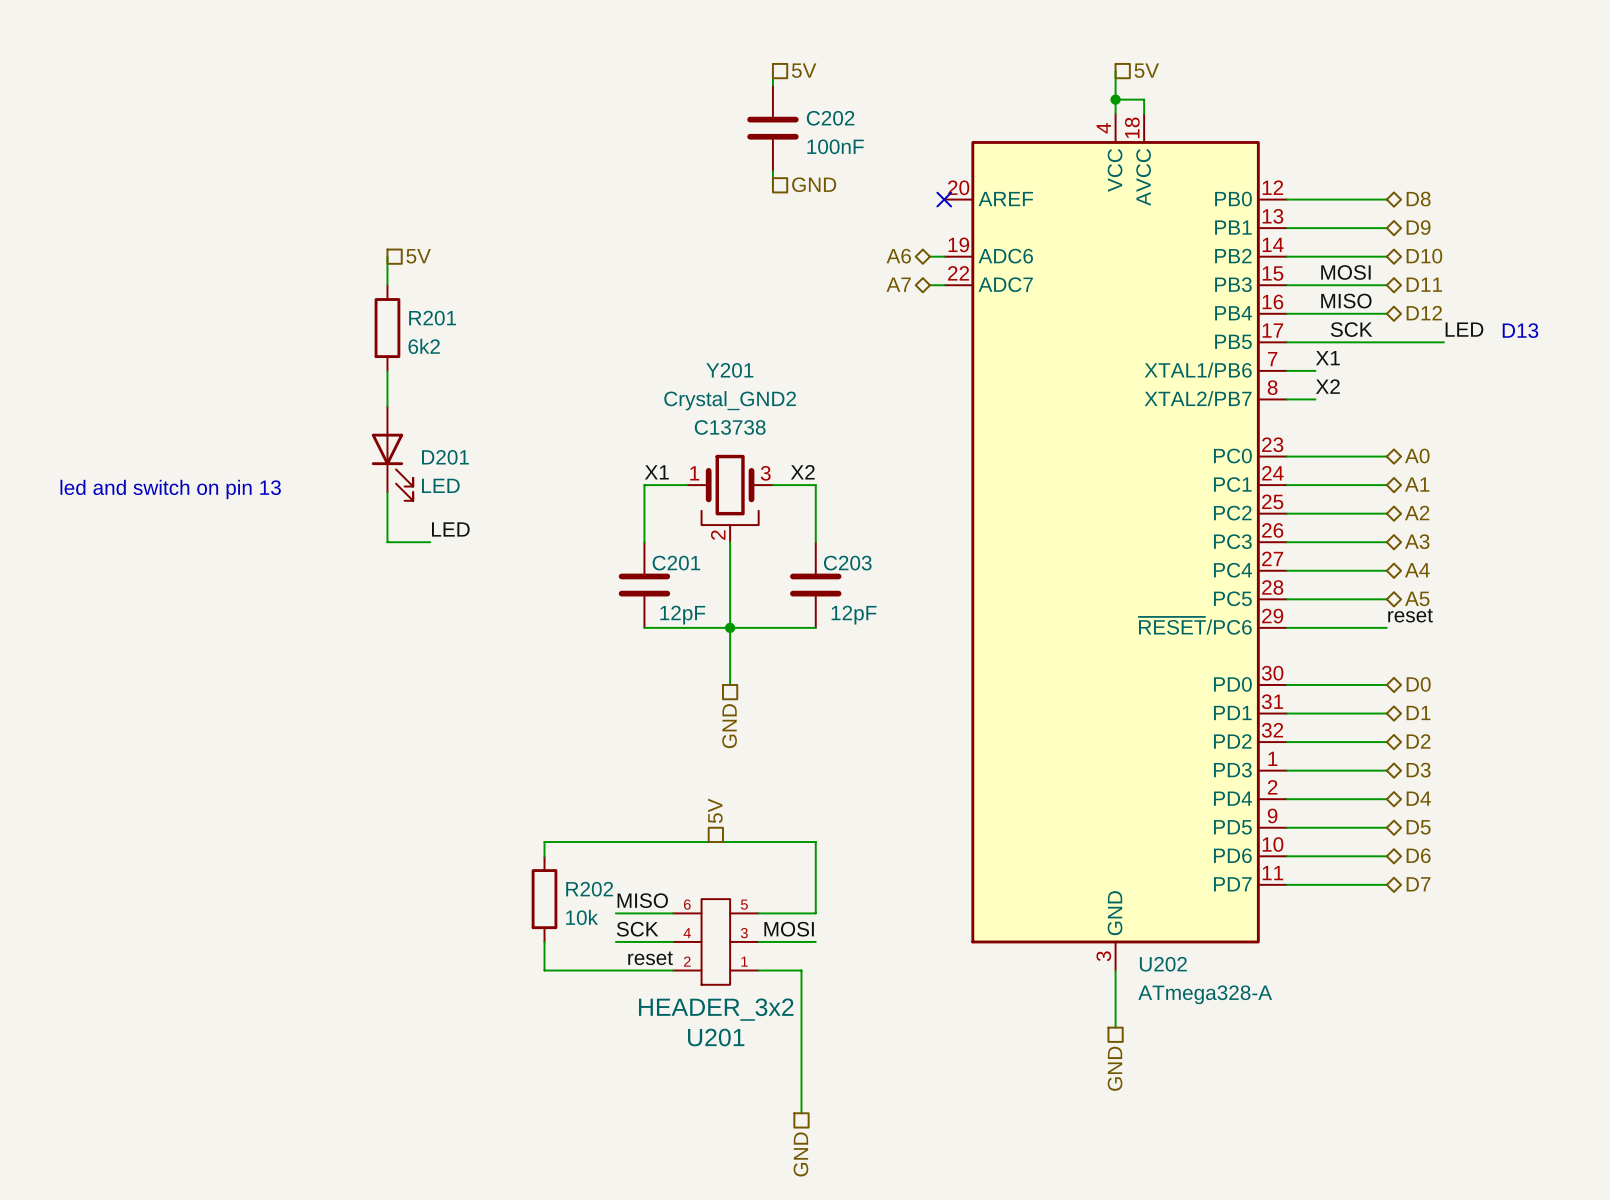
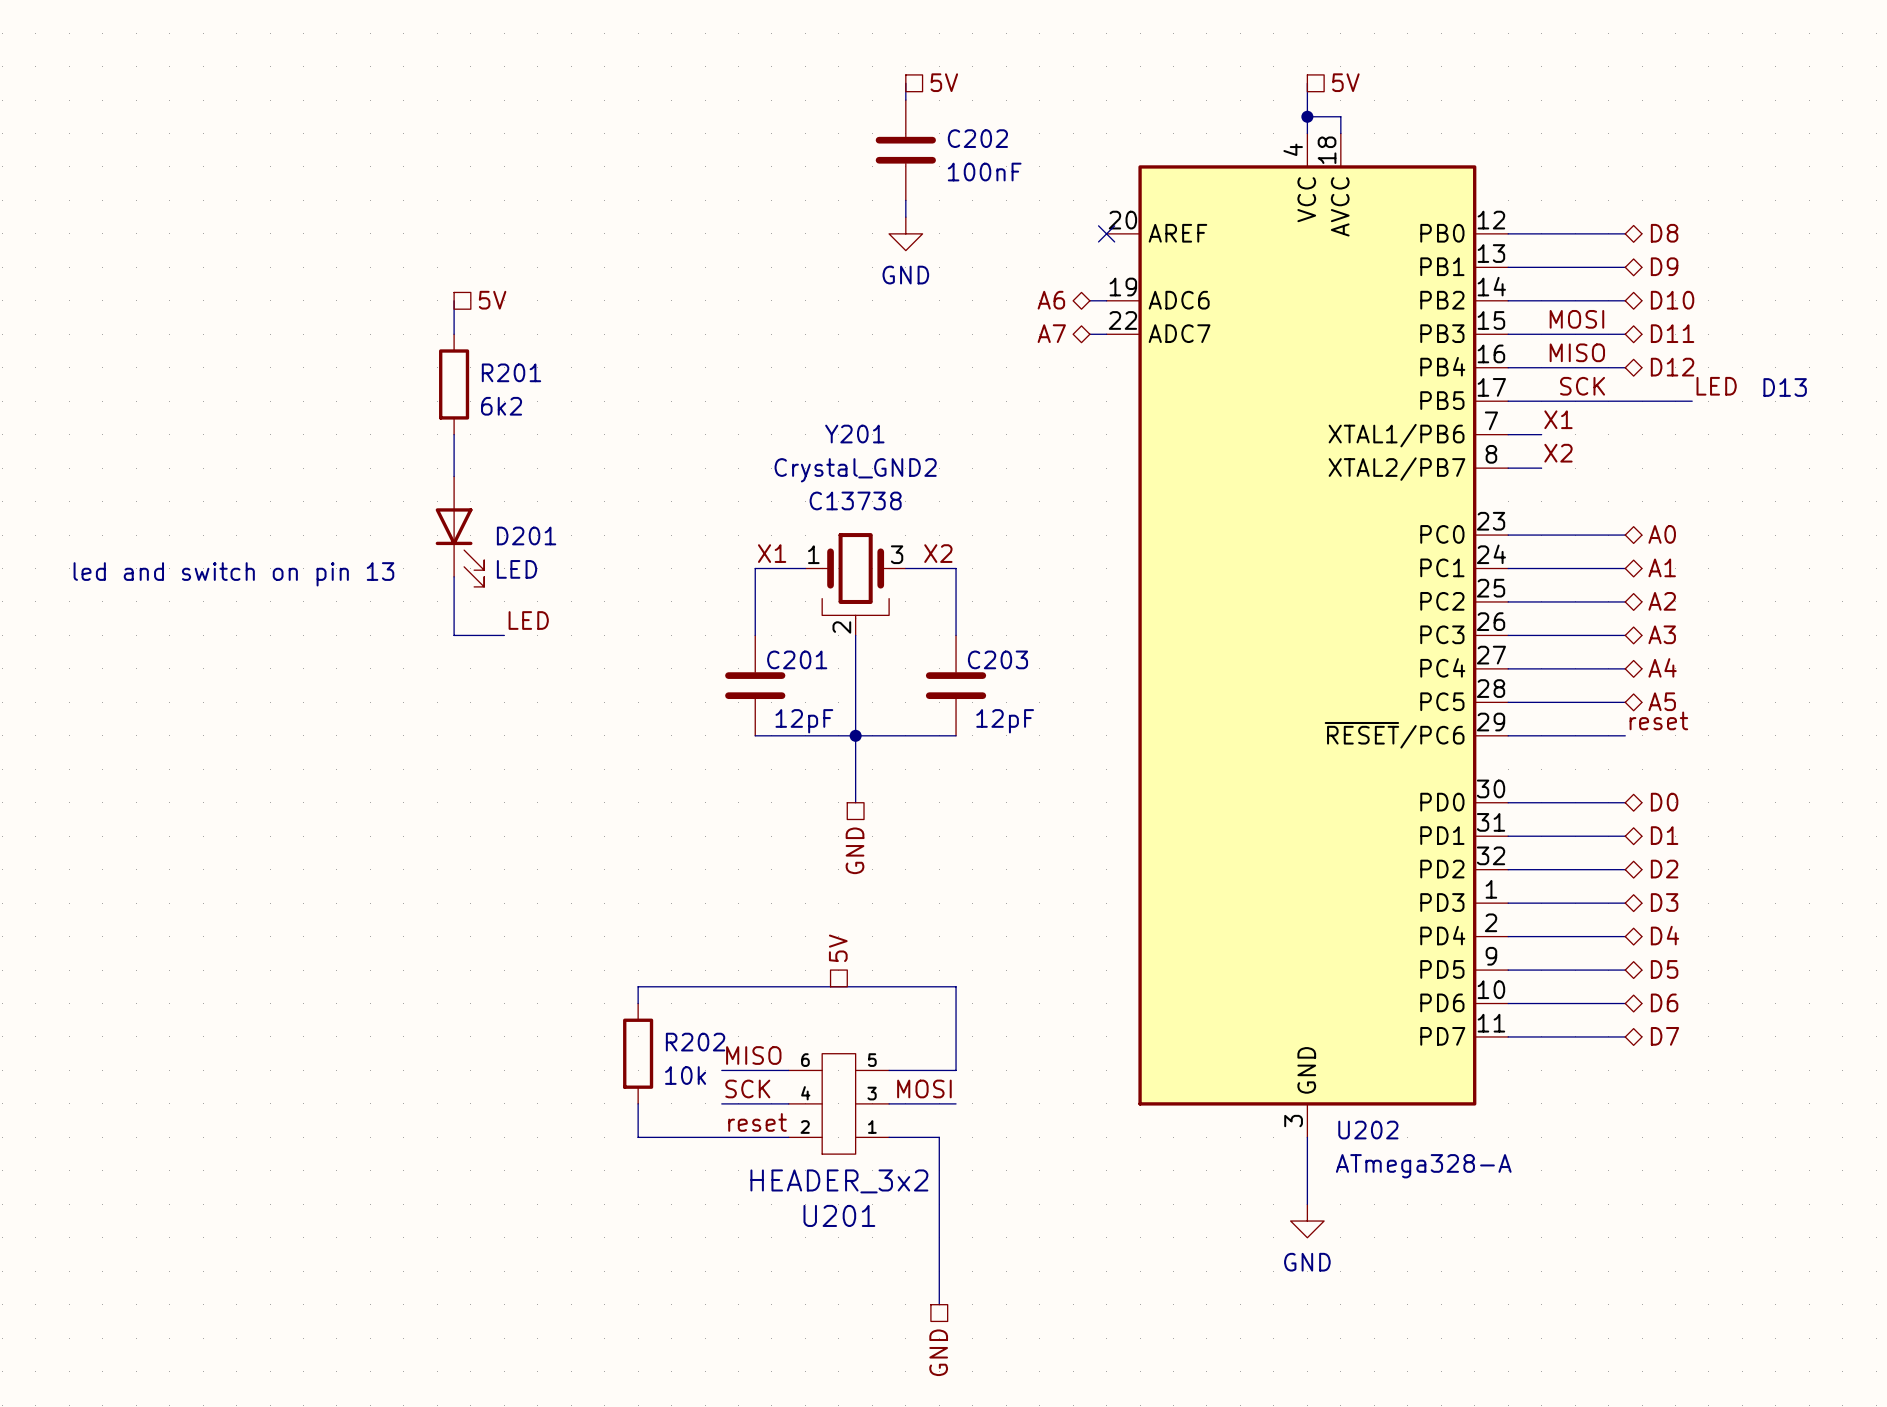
hierarchical label: GND (814, 184) -> none
power symbol: none -> GND (905, 233)
power symbol: none -> GND (1307, 1221)
hierarchical label: GND (1115, 1068) -> none

